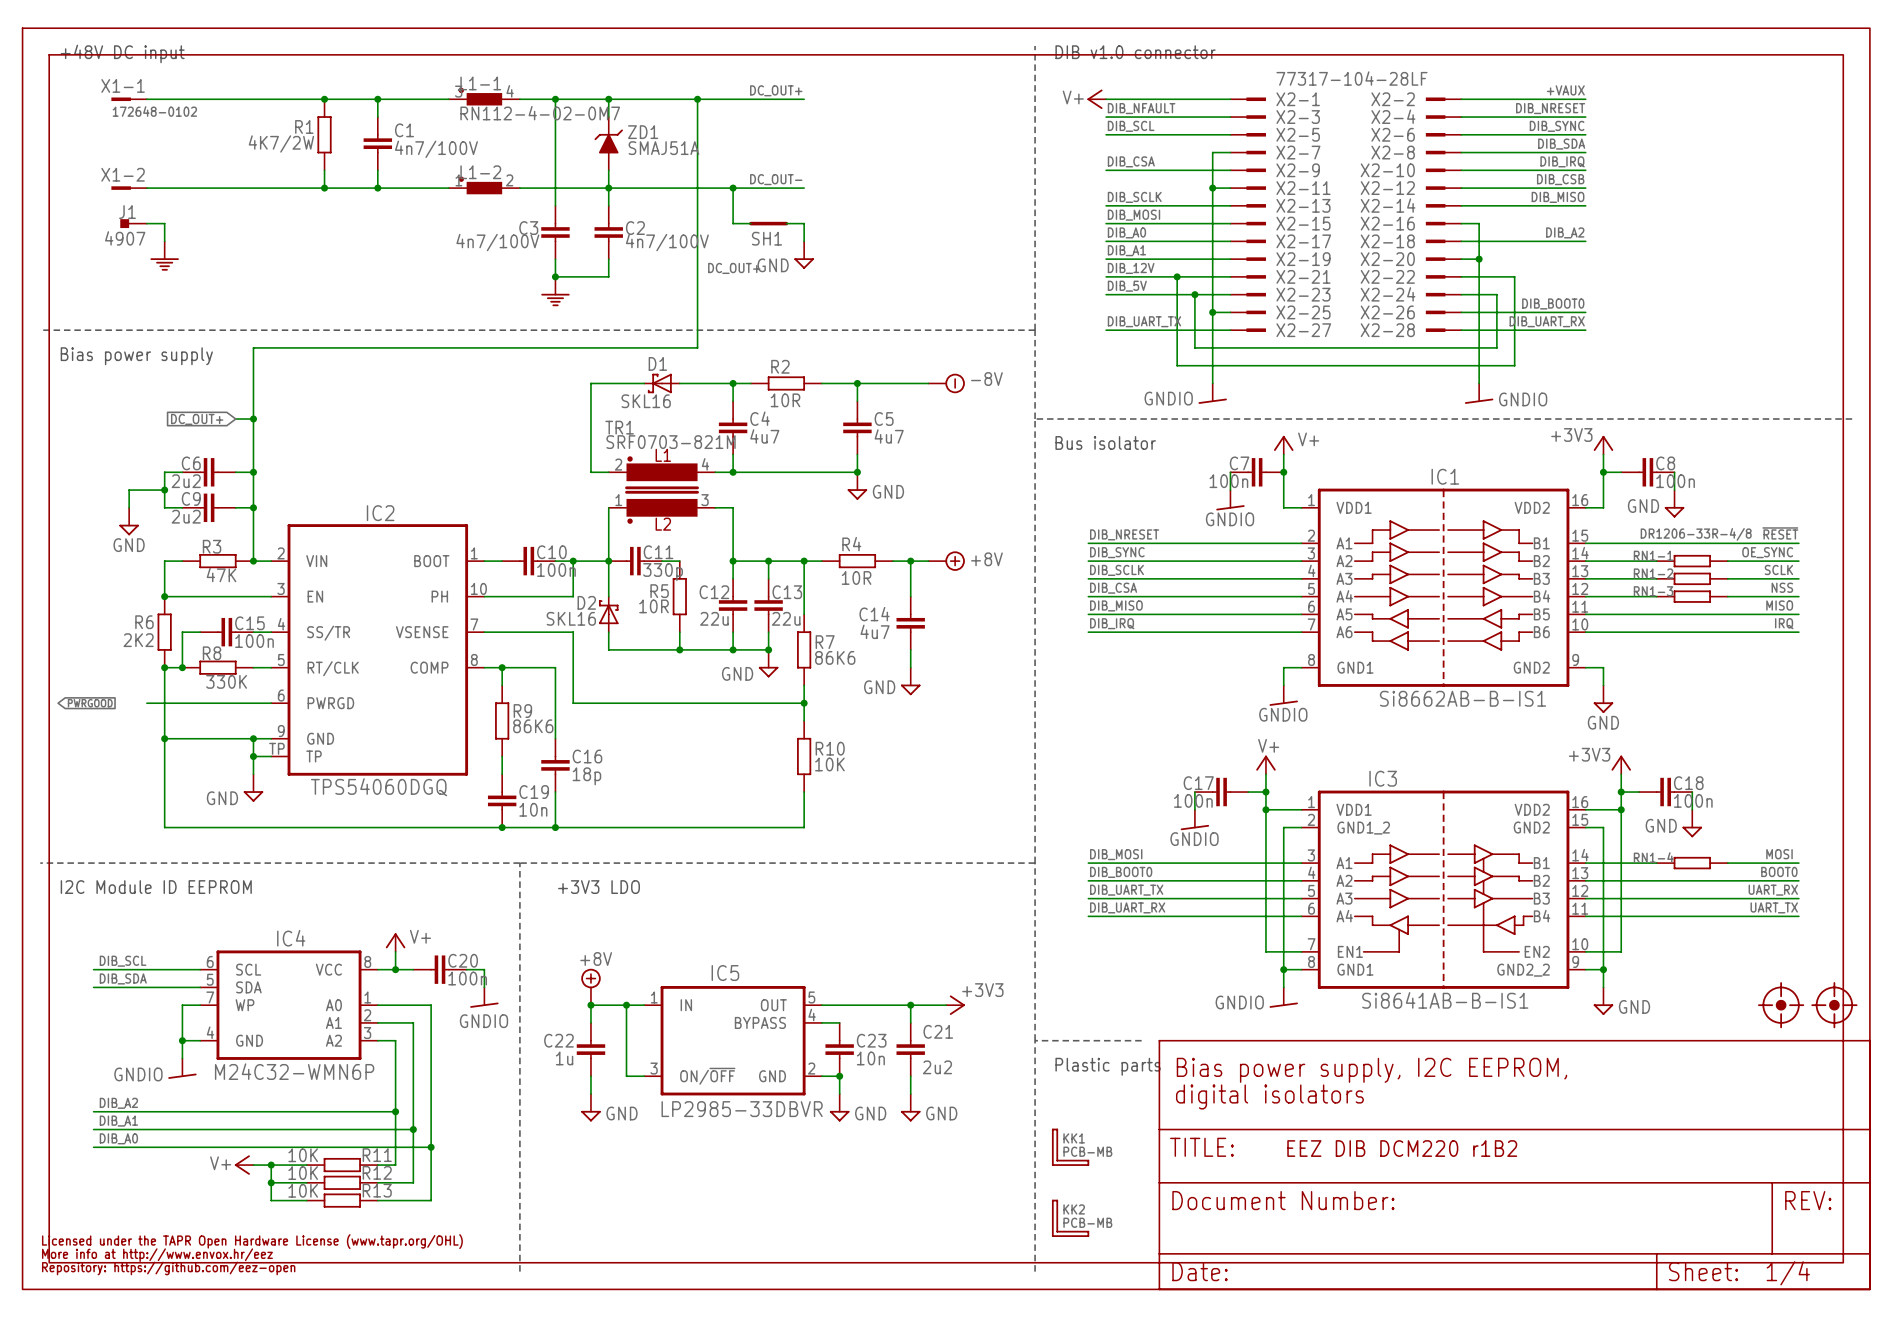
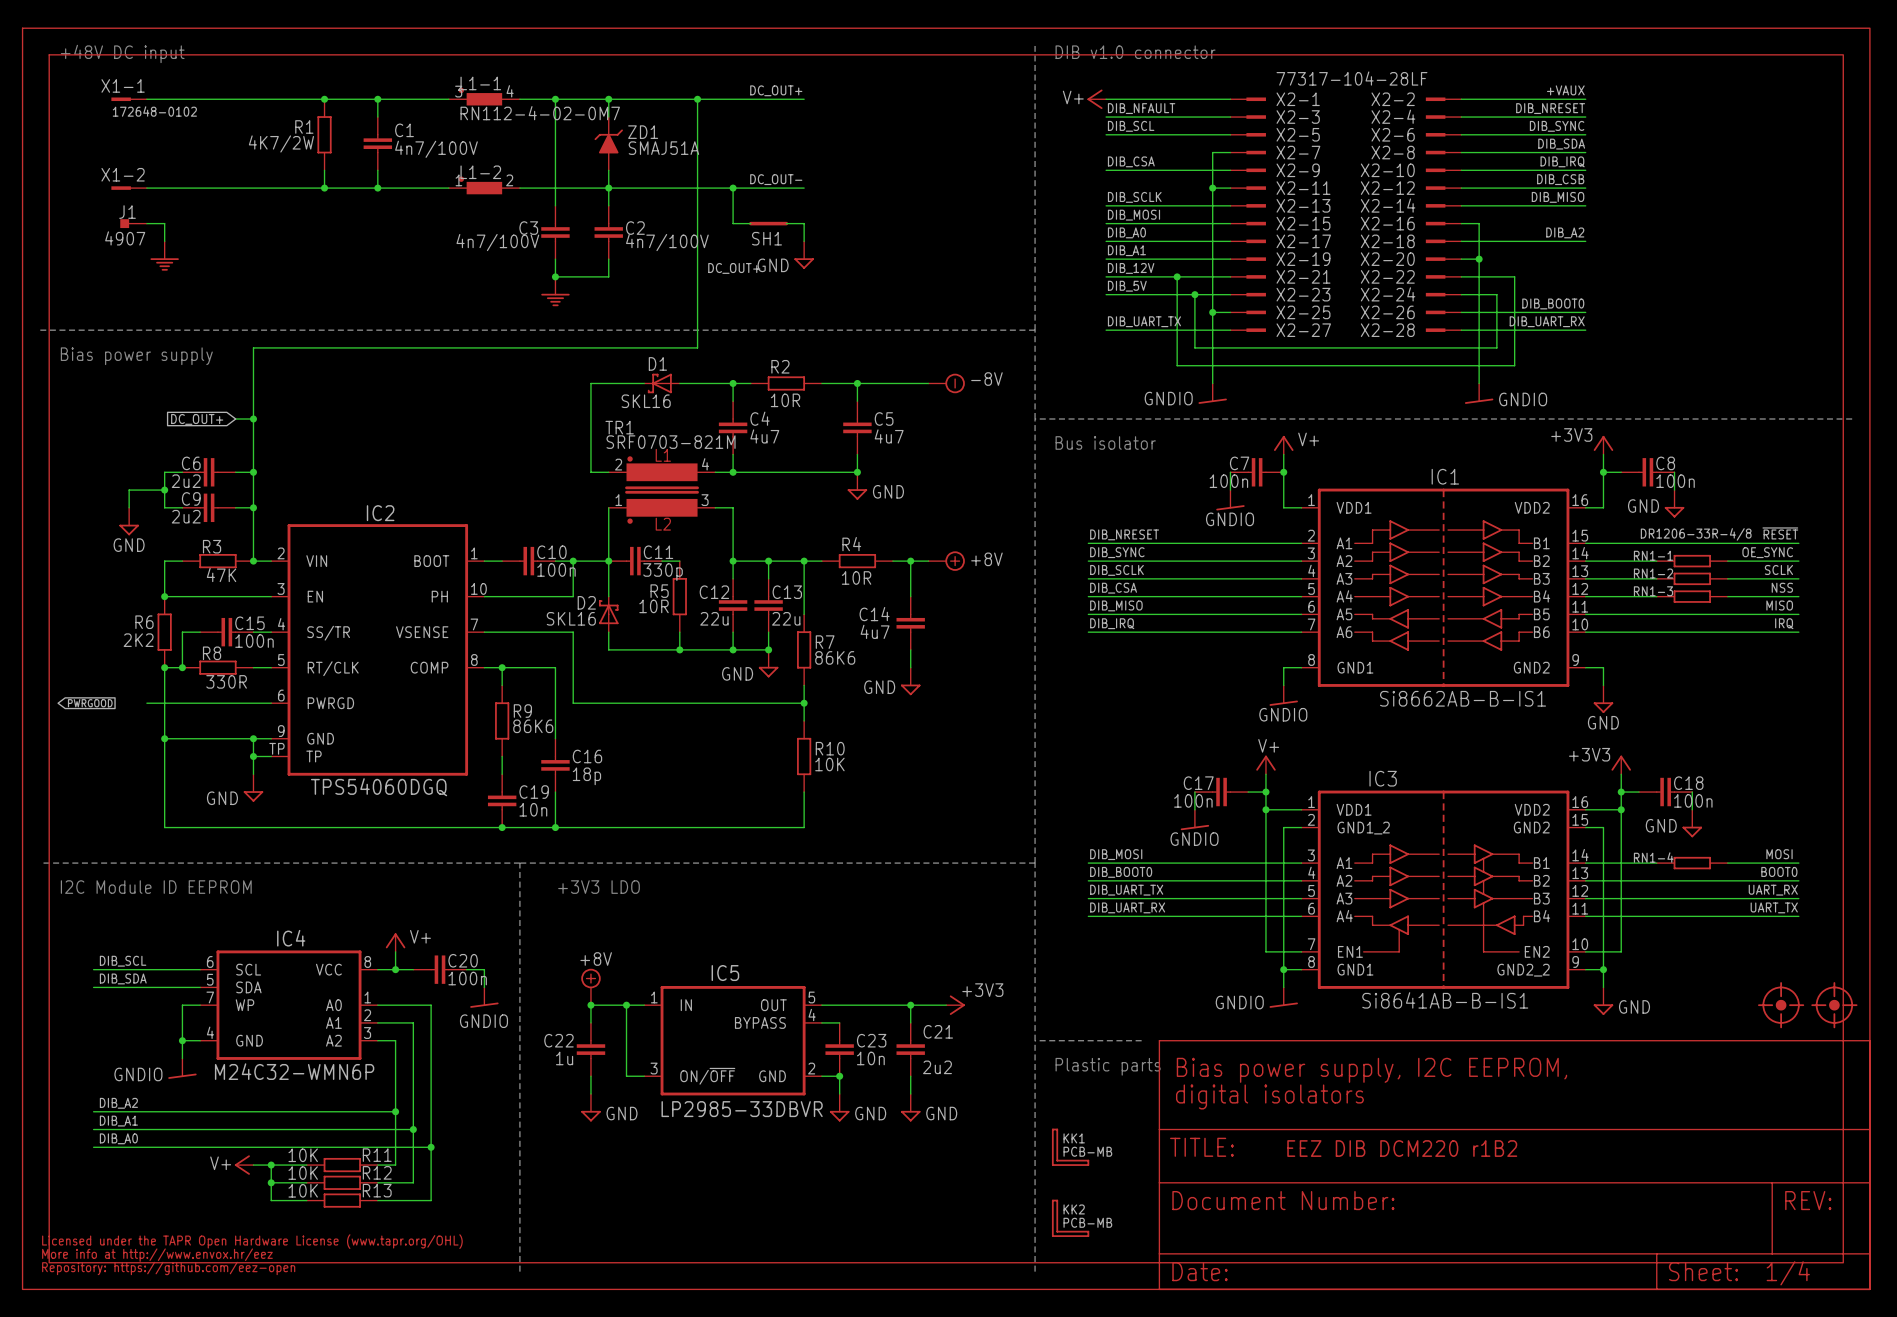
R8 value: 330K (226, 681) -> 330R (226, 681)

